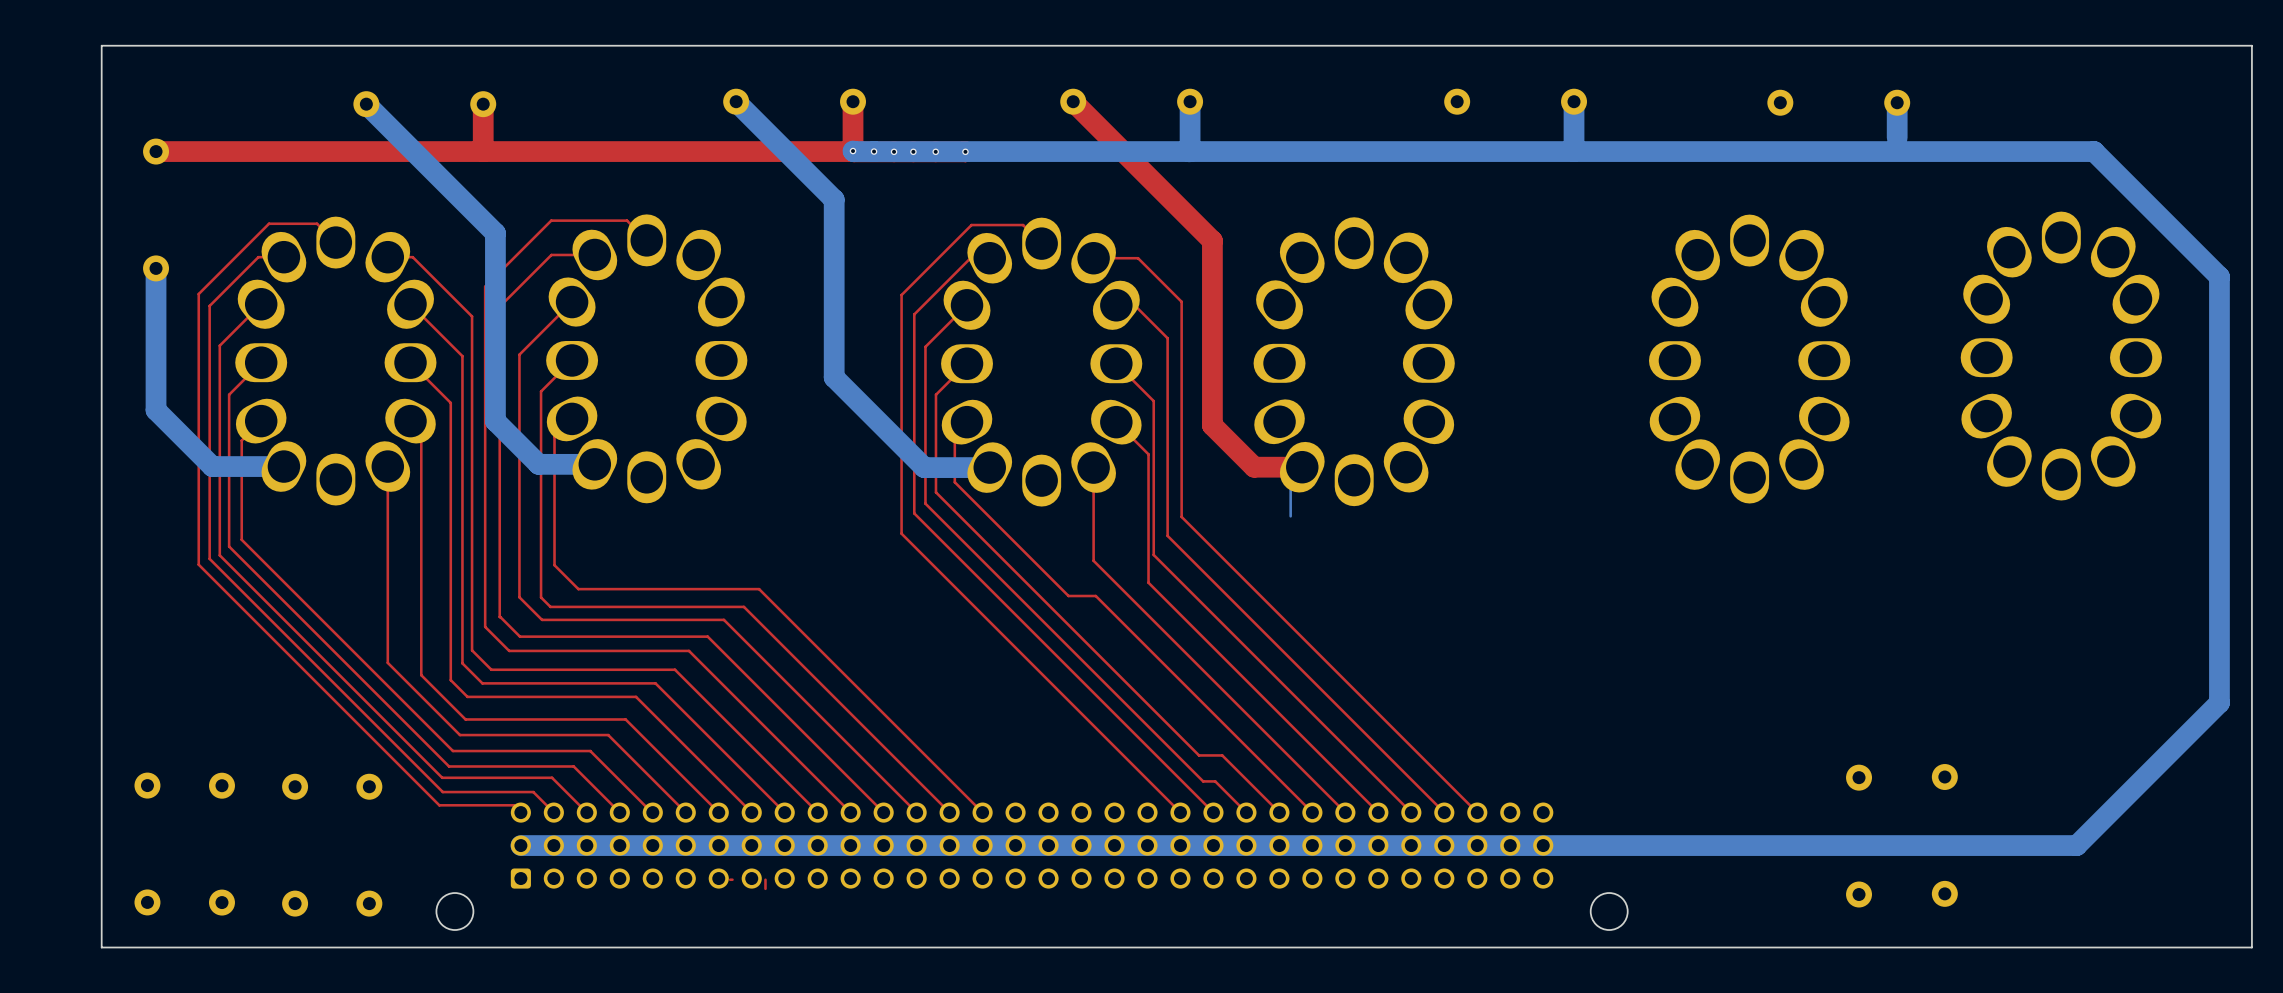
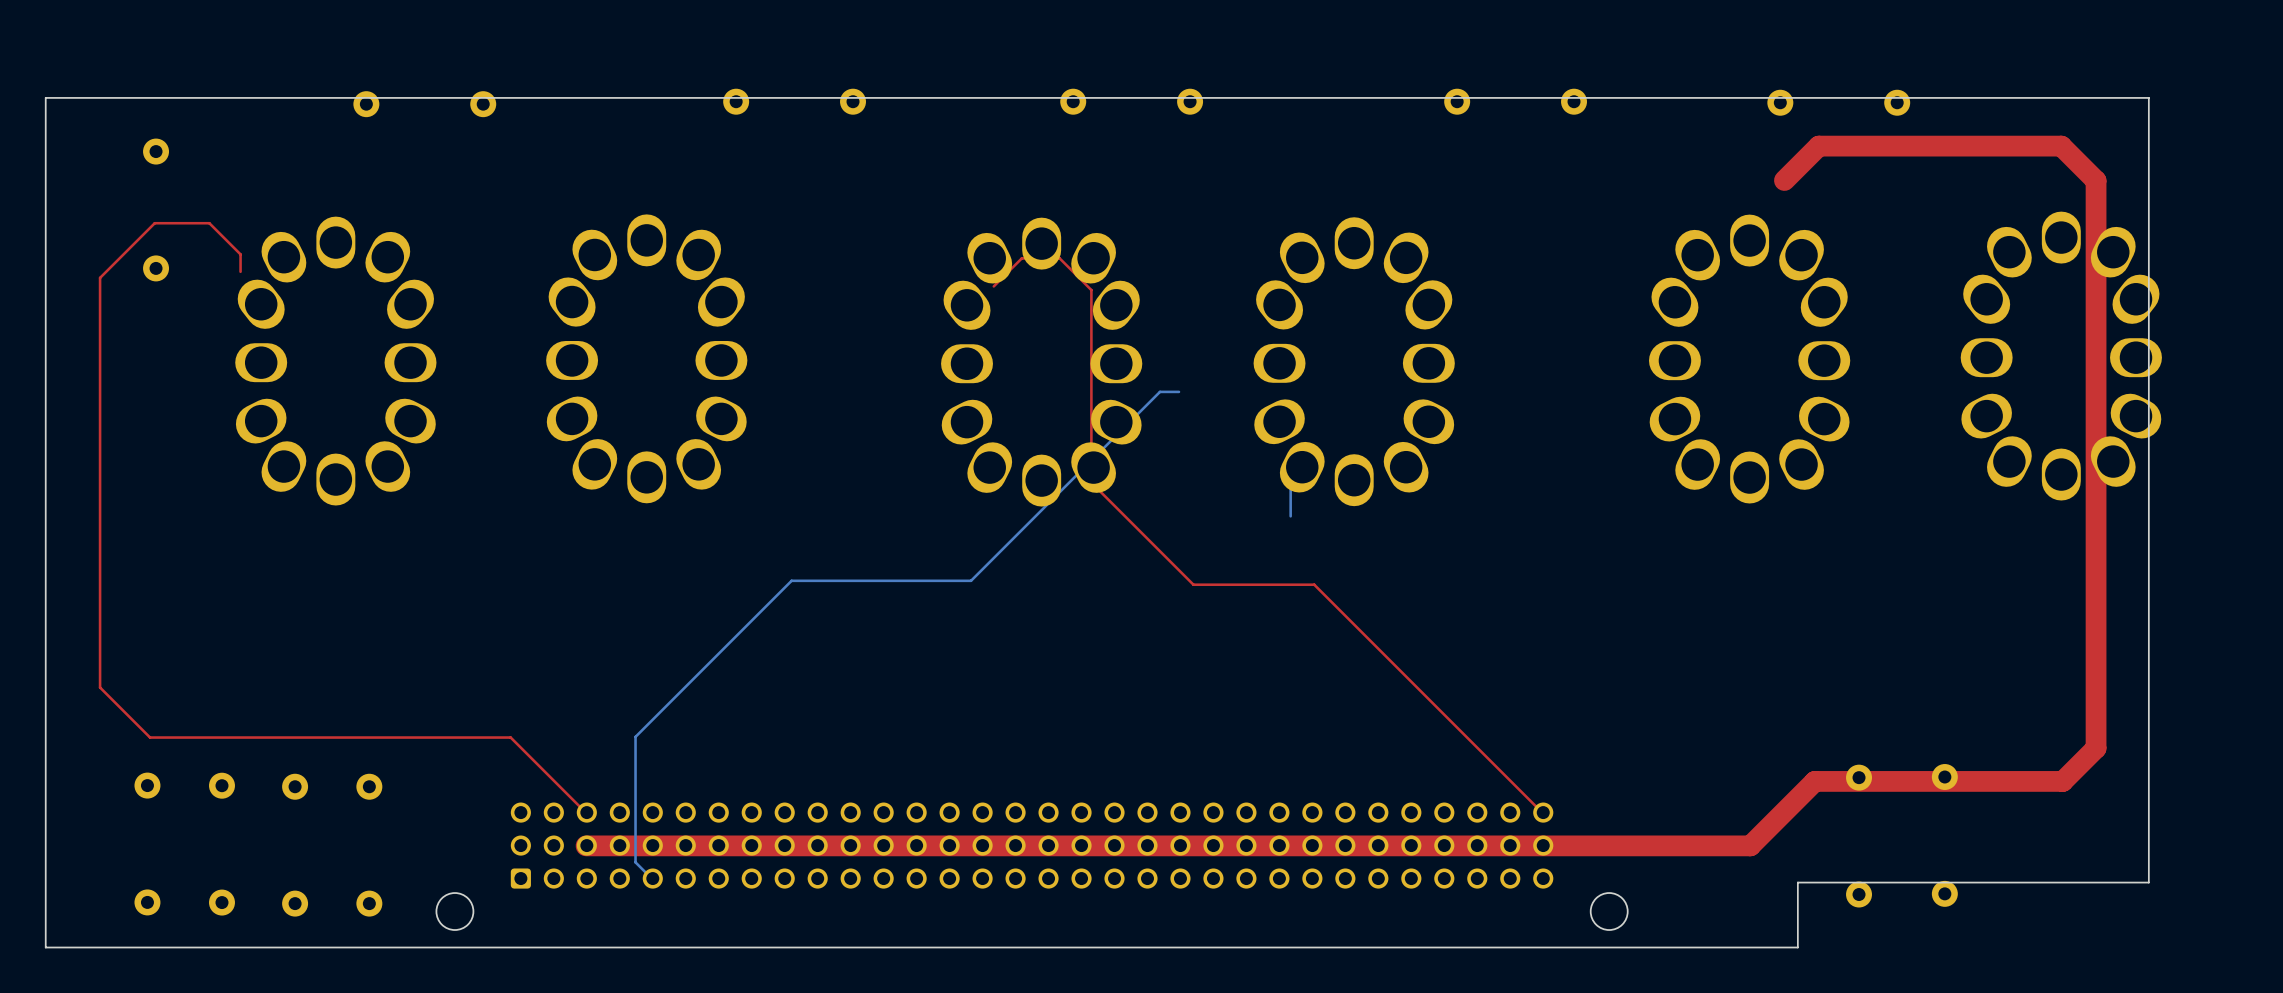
bottom track: (736, 101) (834, 199) (834, 377) (924, 467) (989, 467) -> none
top track: (853, 101) (853, 151) -> none
top track: (1073, 101) (1212, 240) (1212, 425) (1254, 467) (1302, 467) -> none
bottom track: (1190, 101) (1189, 151) -> none
bottom track: (1574, 101) (1574, 151) -> none
bottom track: (1897, 102) (1897, 137) -> none
bottom track: (366, 104) (495, 233) (495, 421) (538, 464) (594, 464) -> none
top track: (483, 104) (483, 151) -> none
top track: (853, 151) (156, 151) -> none
bottom track: (853, 151) (2094, 151) (2219, 276) (2219, 702) (2076, 845) (520, 845) -> none
via: (853, 151) -> none
via: (874, 151) -> none
via: (894, 151) -> none
via: (913, 151) -> none
via: (935, 151) -> none
via: (965, 151) -> none
top track: none -> (1784, 180) (1818, 146) (2061, 146) (2096, 180) (2096, 748) (2062, 781) (1814, 781) (1750, 845) (586, 845)
top track: (646, 240) (627, 220) (551, 220) (485, 286) (485, 626) (509, 650) (689, 650) (850, 812) -> none
top track: (335, 242) (317, 223) (269, 223) (198, 294) (198, 564) (439, 805) (513, 805) (520, 812) -> none
top track: (1041, 243) (1023, 225) (971, 225) (901, 295) (901, 533) (1180, 812) -> none
top track: (594, 254) (551, 254) (499, 306) (499, 617) (519, 636) (707, 636) (883, 812) -> none
top track: (387, 257) (412, 257) (472, 316) (472, 650) (491, 669) (675, 669) (817, 812) -> none
top track: (989, 258) (970, 258) (914, 314) (914, 513) (1213, 812) -> none
top track: (1093, 258) (1138, 258) (1181, 301) (1181, 516) (1477, 812) -> none
bottom track: (156, 268) (156, 410) (212, 466) (283, 466) -> none
top track: (294, 268) (283, 257) (258, 257) (209, 305) (209, 558) (442, 792) (533, 792) (553, 812) -> none
top track: none -> (240, 271) (240, 254) (209, 223) (154, 223) (100, 277) (100, 687) (150, 737) (510, 737) (586, 812)
top track: none -> (993, 286) (1021, 258) (1059, 258) (1091, 290) (1091, 482) (1193, 584) (1314, 584) (1542, 812)
top track: (572, 302) (519, 354) (519, 597) (542, 619) (723, 619) (916, 812) -> none
top track: (261, 304) (219, 345) (219, 555) (442, 777) (552, 777) (586, 812) -> none
top track: (410, 304) (462, 356) (462, 663) (482, 683) (655, 683) (784, 812) -> none
top track: (967, 305) (925, 346) (925, 503) (1203, 781) (1215, 781) (1246, 812) -> none
top track: (1116, 305) (1134, 305) (1167, 338) (1167, 535) (1444, 812) -> none
top track: (572, 360) (541, 391) (541, 597) (550, 606) (743, 606) (949, 812) -> none
top track: (245, 362) (261, 362) (229, 394) (229, 546) (449, 766) (573, 766) (619, 812) -> none
top track: (410, 362) (450, 402) (450, 680) (467, 696) (636, 696) (751, 812) -> none
top track: (967, 363) (935, 394) (935, 492) (1199, 755) (1222, 755) (1279, 812) -> none
top track: (1116, 363) (1153, 401) (1153, 554) (1411, 812) -> none
bottom track: none -> (1178, 391) (1159, 391) (971, 580) (791, 580) (635, 736) (635, 862) (652, 878)
top track: (572, 418) (554, 436) (554, 565) (578, 589) (759, 589) (982, 812) -> none
top track: (261, 421) (241, 440) (241, 539) (452, 751) (590, 751) (652, 812) -> none
top track: (410, 421) (421, 431) (421, 675) (465, 719) (625, 719) (718, 812) -> none
top track: (967, 422) (954, 434) (954, 482) (1068, 596) (1095, 596) (1312, 812) -> none
top track: (1116, 422) (1148, 454) (1148, 582) (1378, 812) -> none
top track: (387, 466) (387, 662) (459, 735) (608, 735) (685, 812) -> none
top track: (1093, 467) (1093, 560) (1345, 812) -> none
top track: (732, 879) (730, 879) -> none
top track: (765, 879) (765, 888) -> none
board edge: (1797, 947) (2251, 947) (2251, 45) (101, 45) (101, 947) -> (1797, 947) (1797, 882) (2148, 882) (2148, 97) (45, 97) (45, 947) (101, 947)

